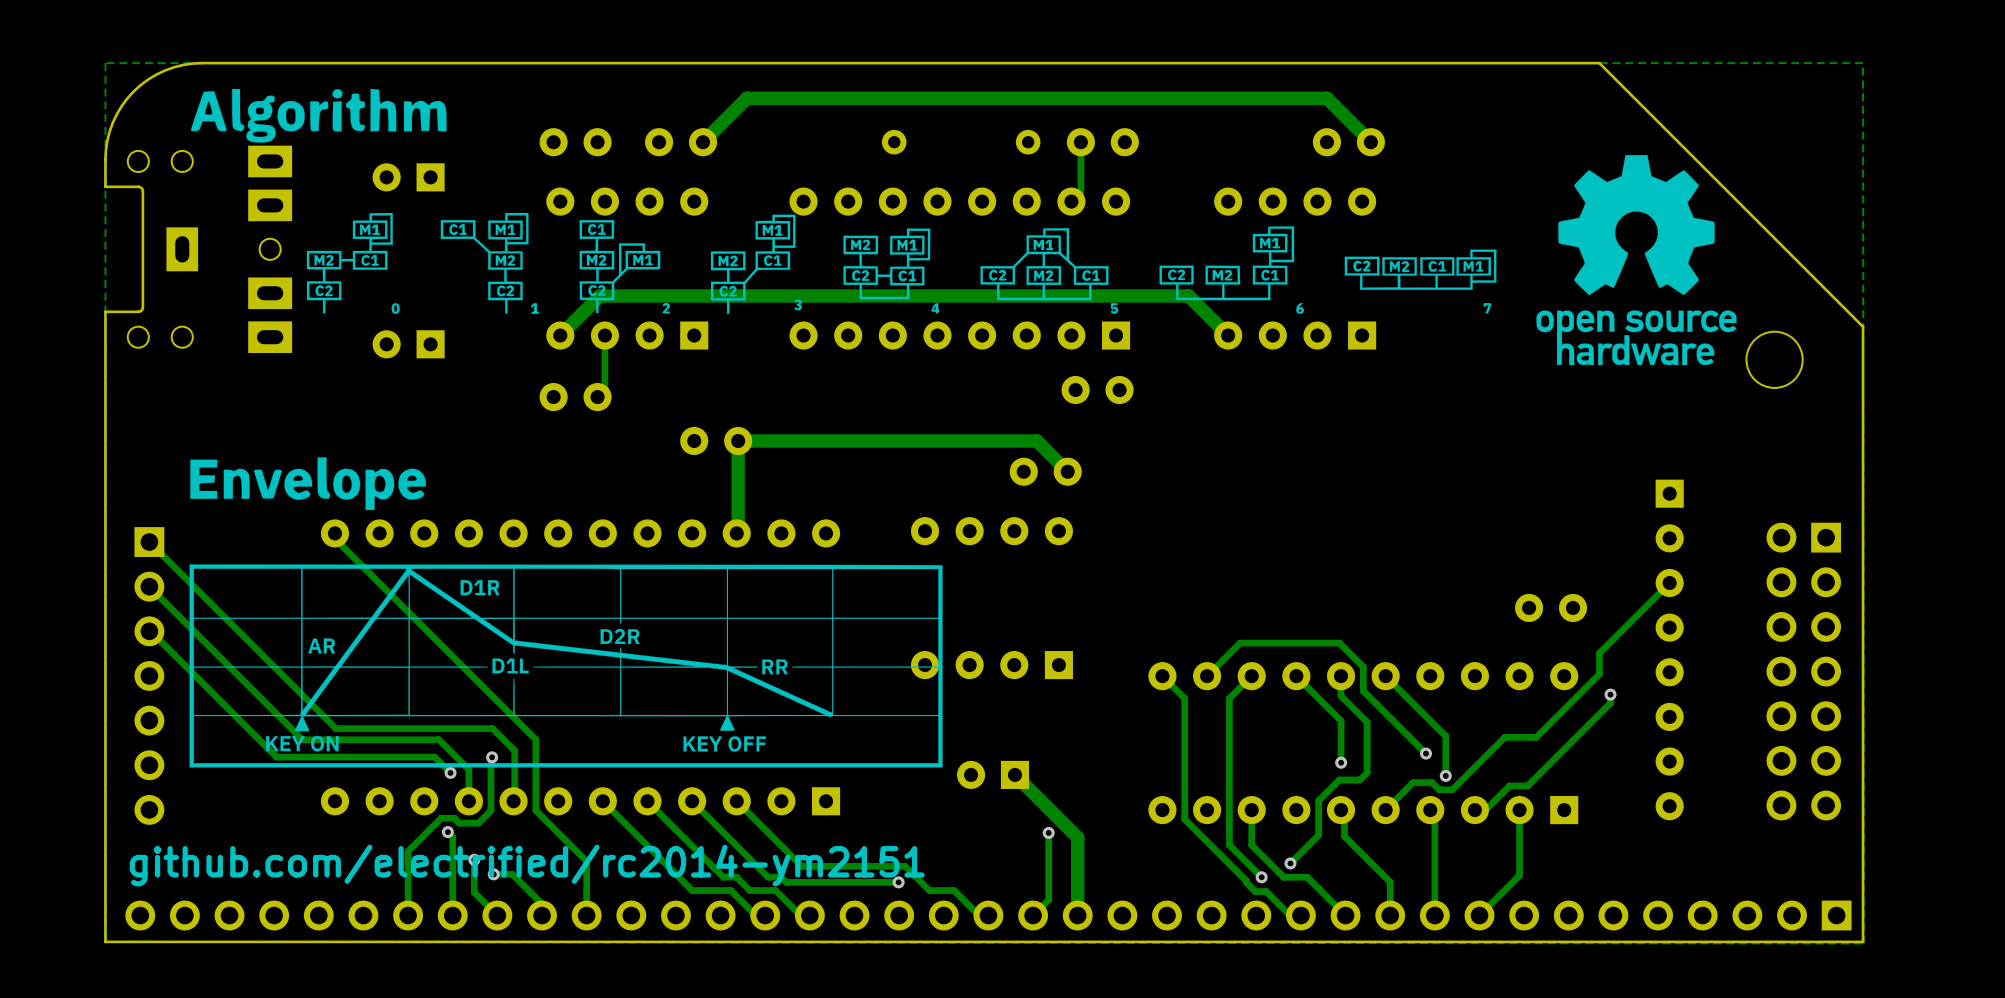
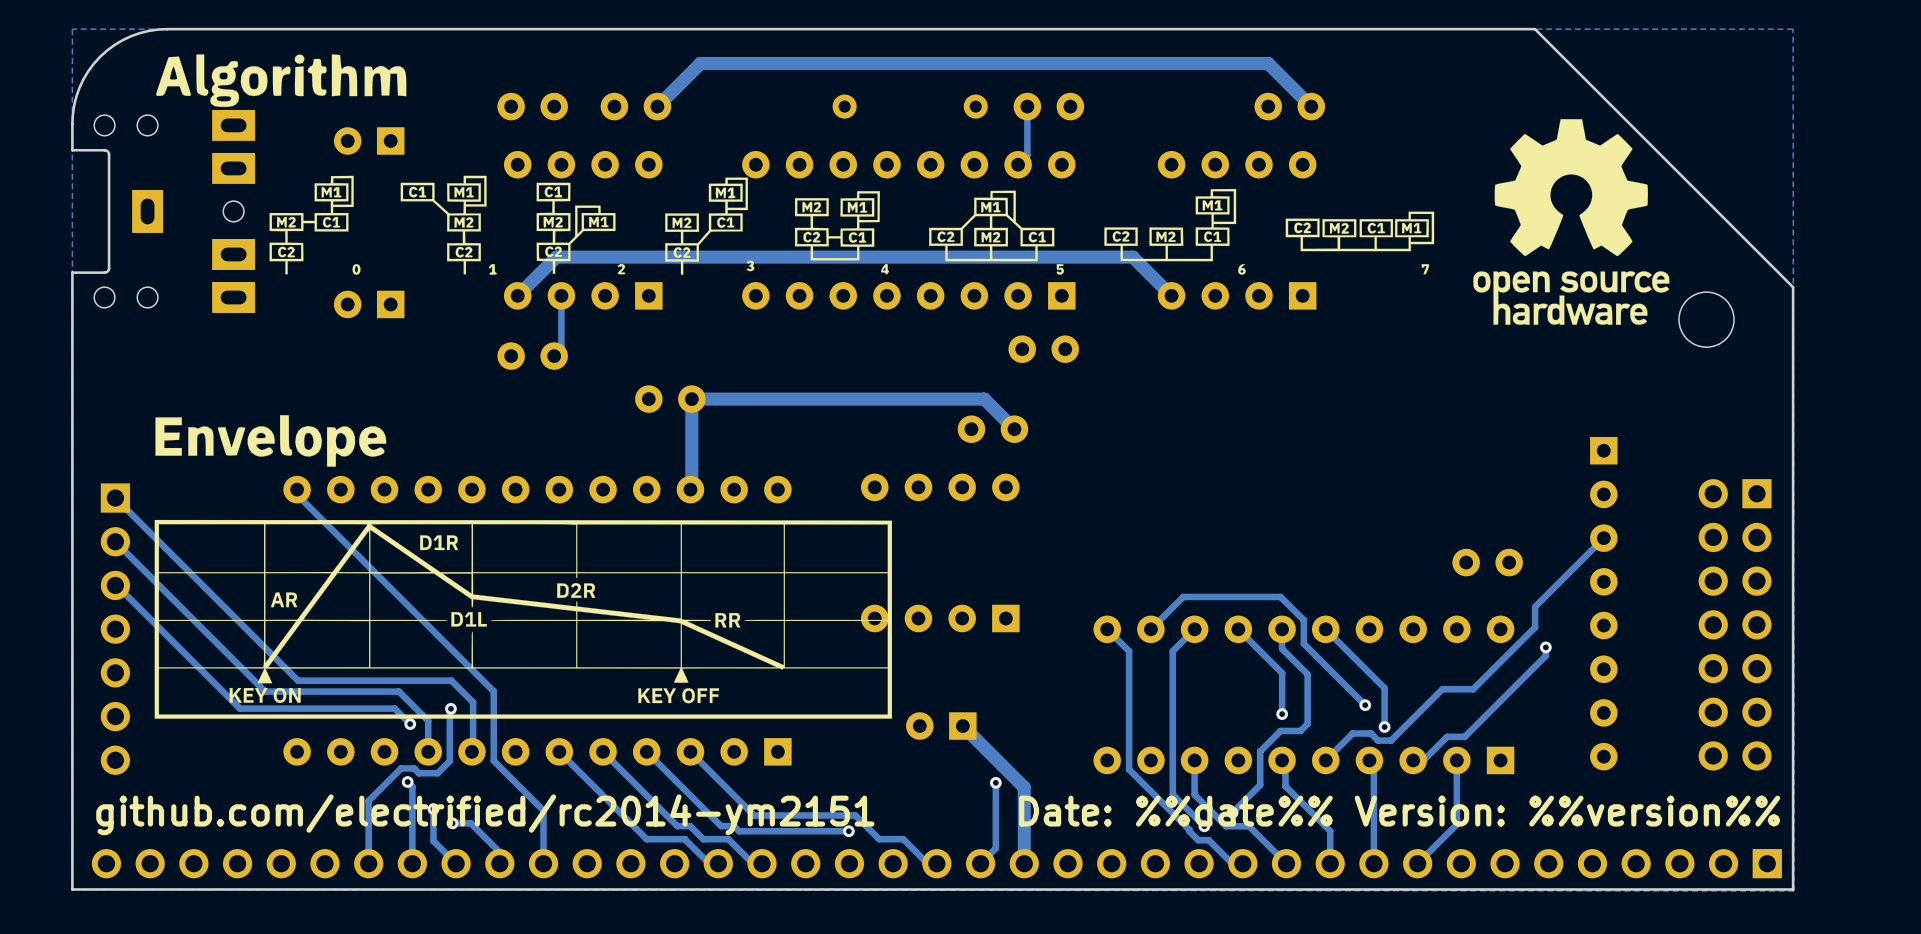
text: none -> Date: %%date%% Version: %%version%% (1399, 811)

